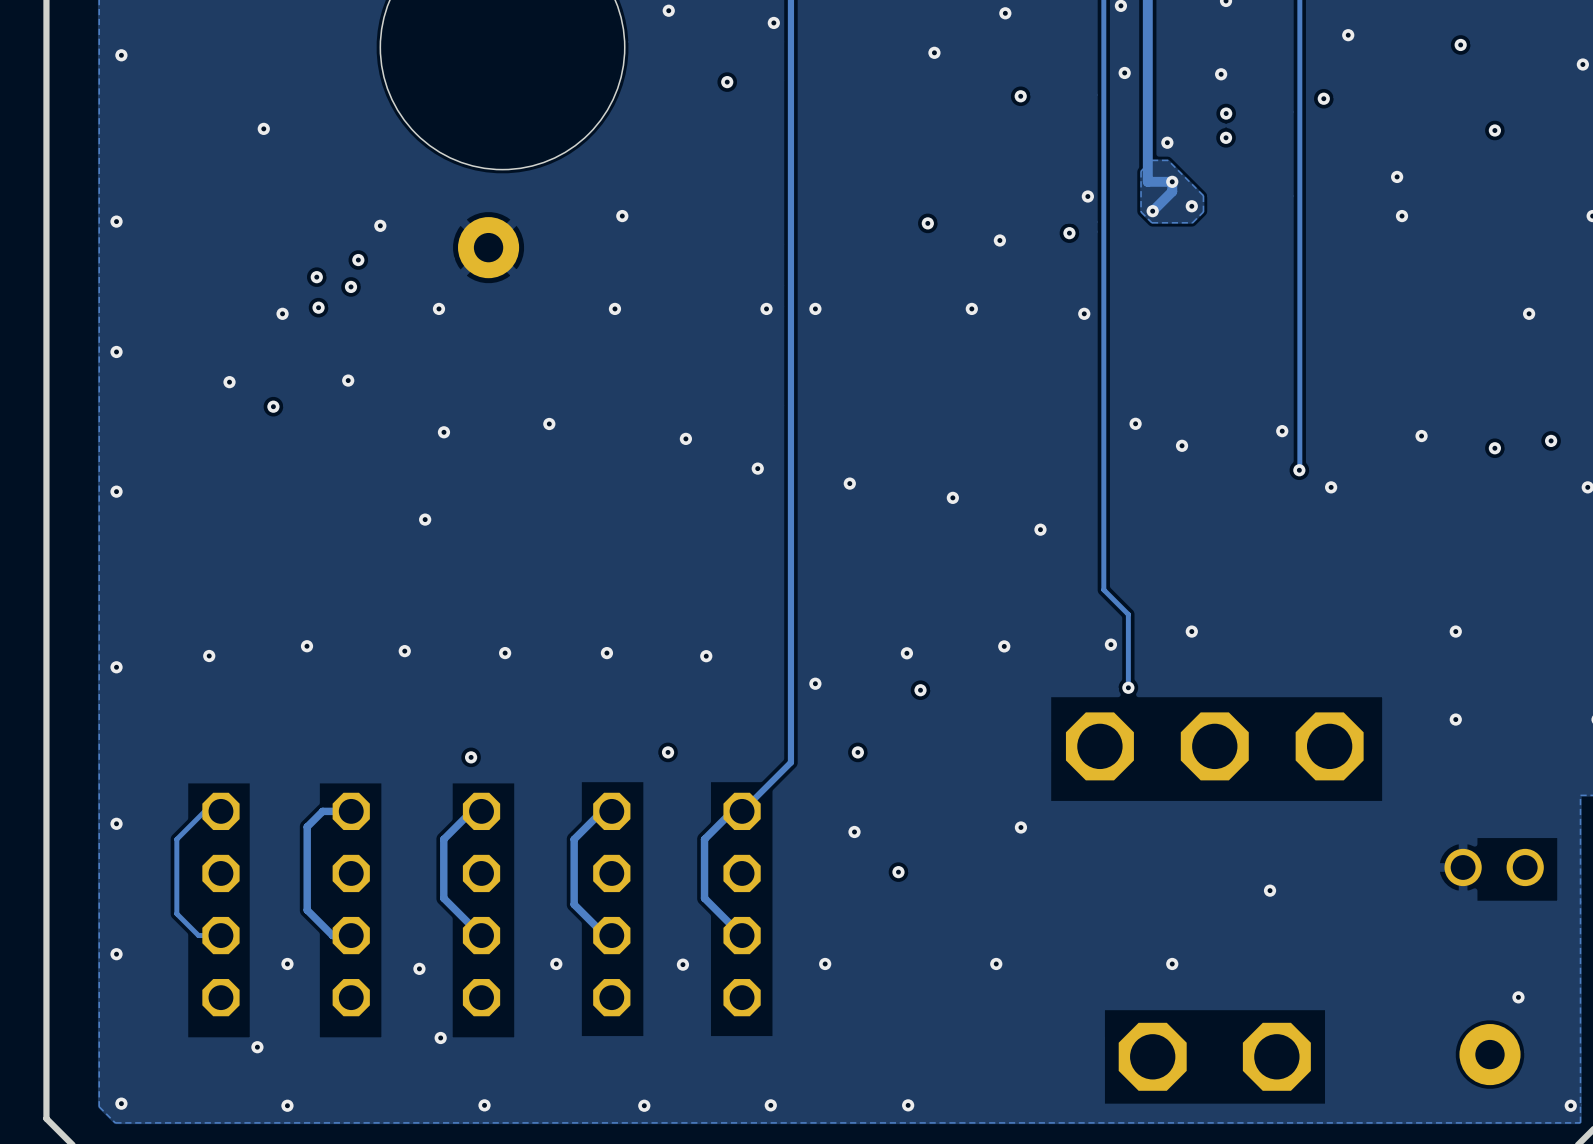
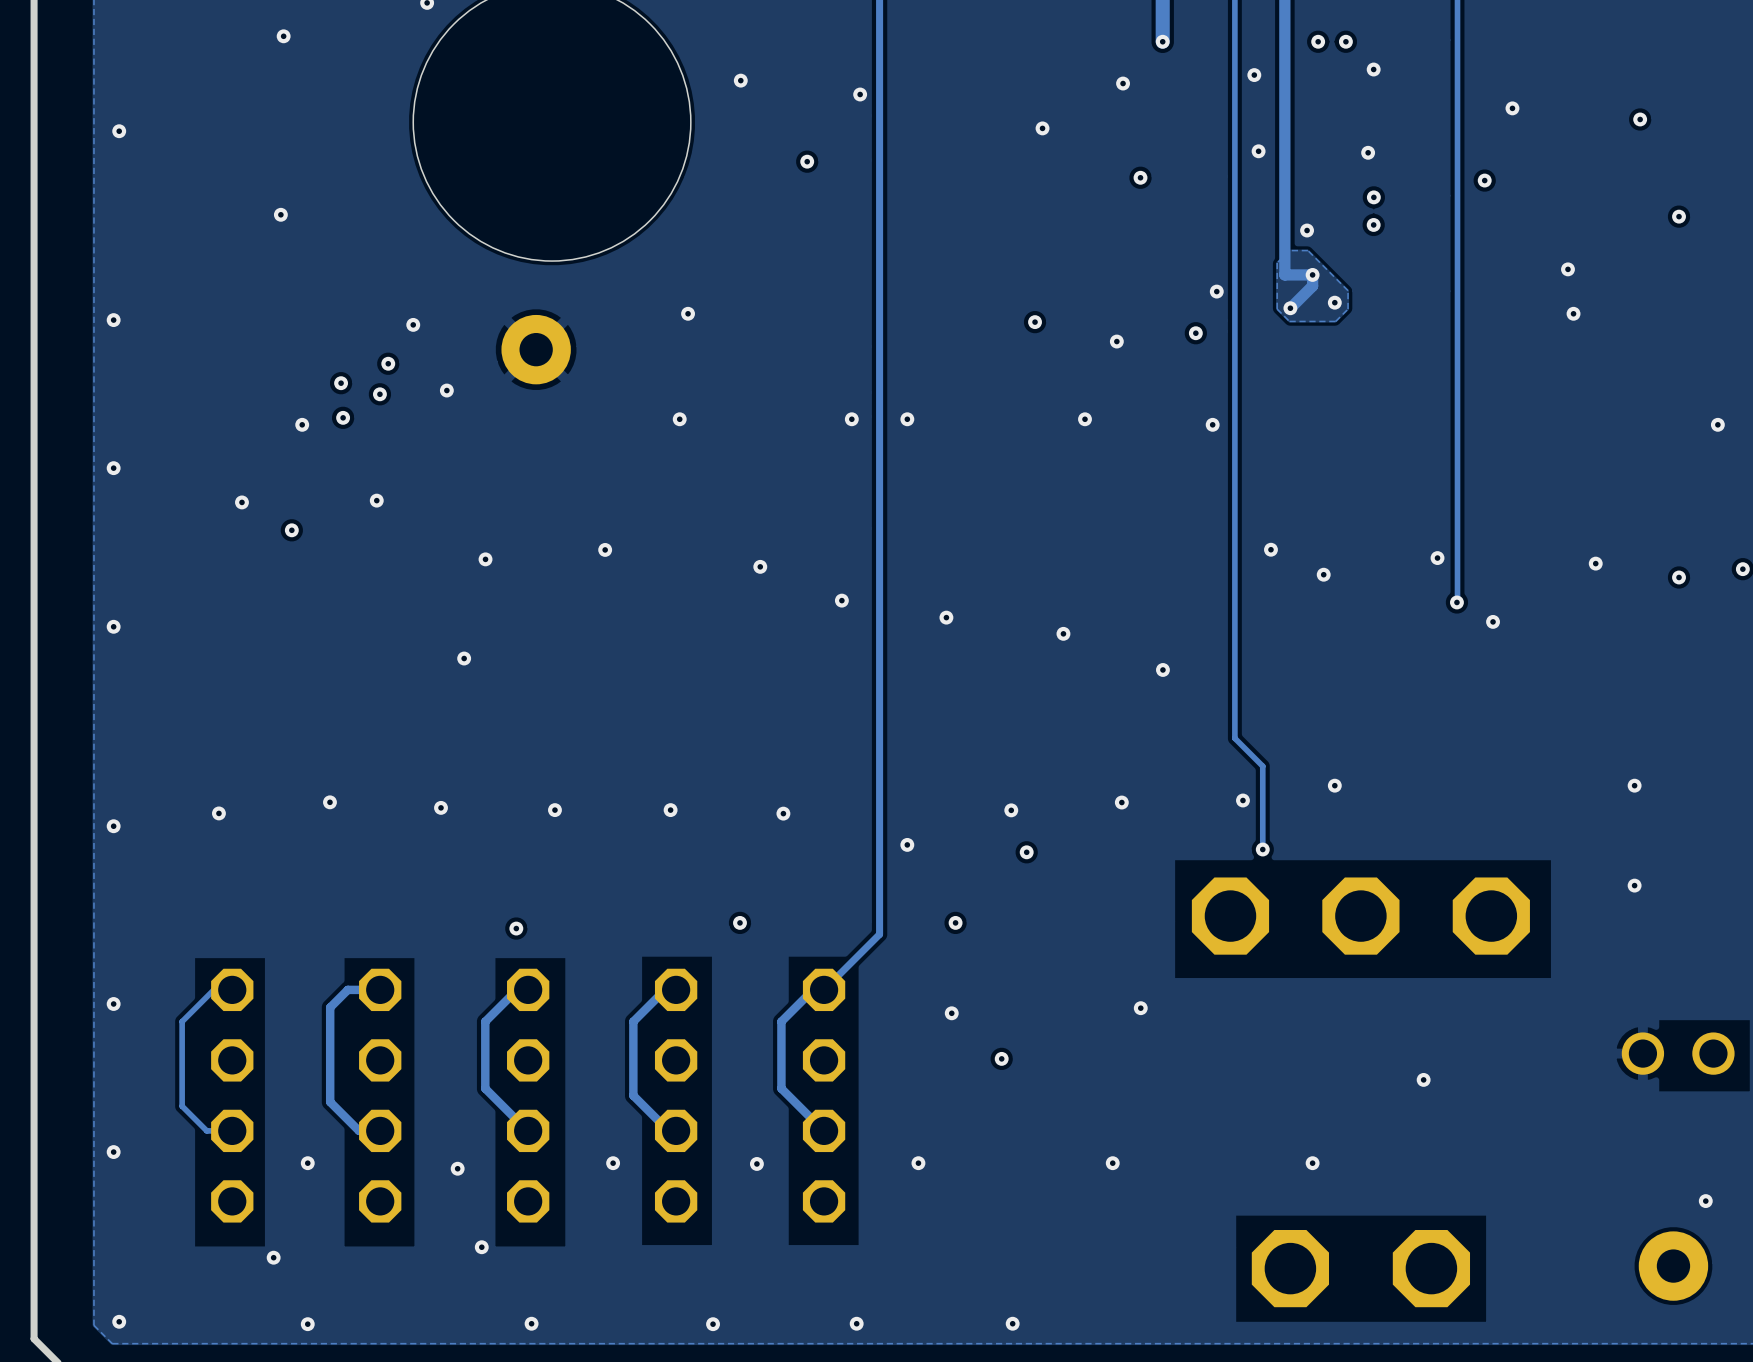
via position: (438, 308) -> (446, 390)

